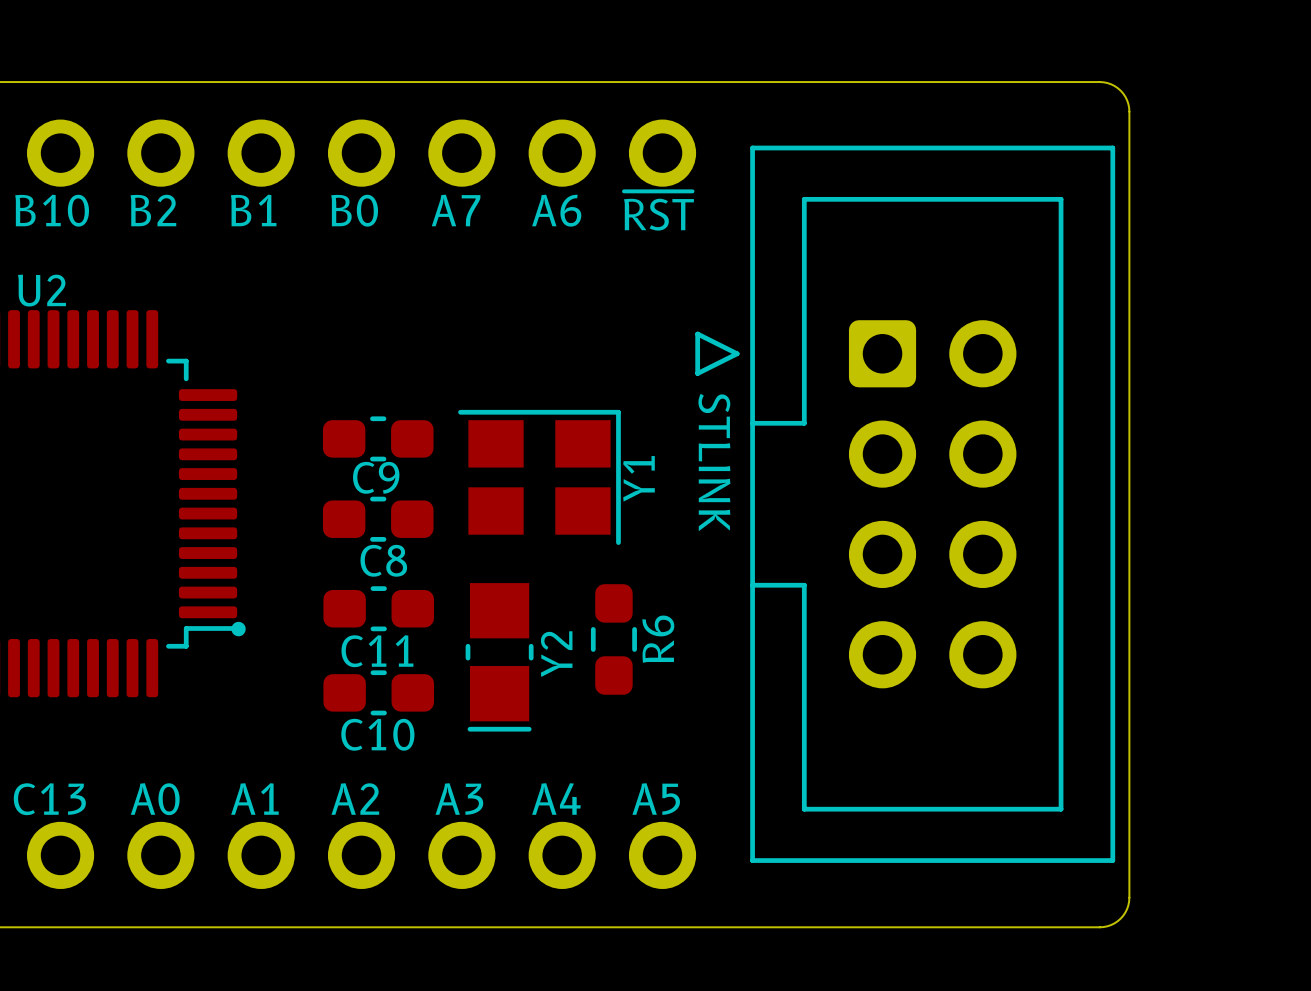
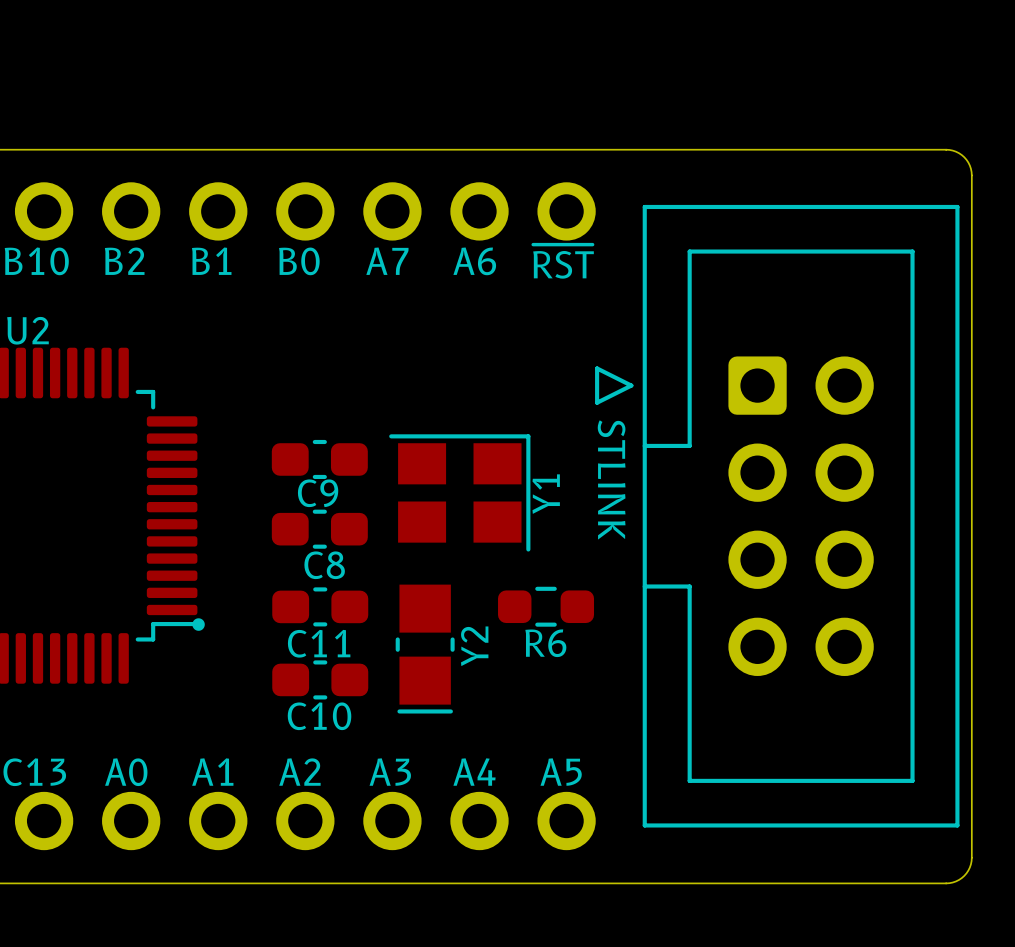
R6 rotation: 0° (613, 639) -> 90° clockwise (546, 606)

